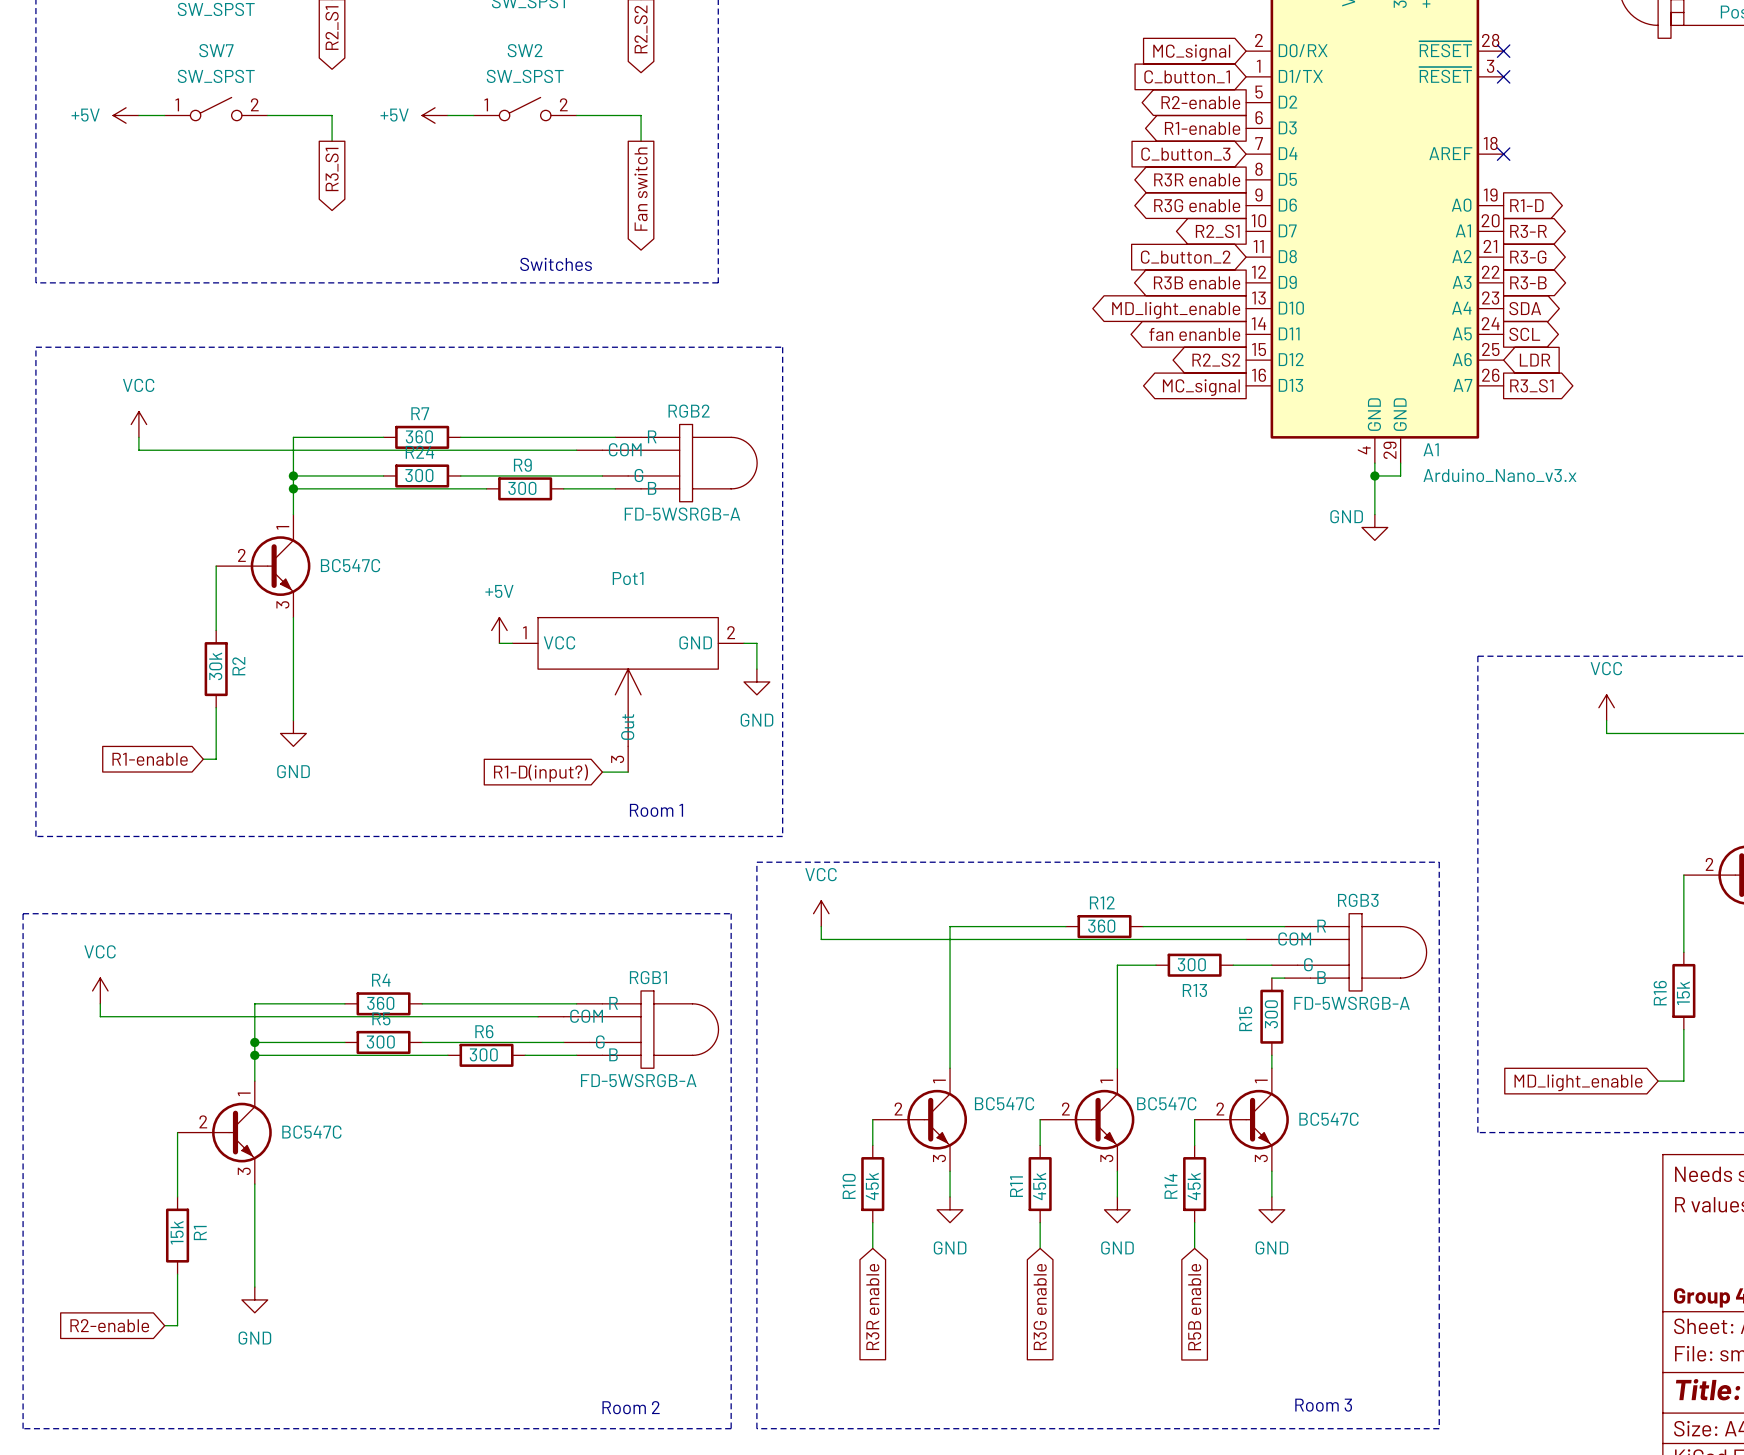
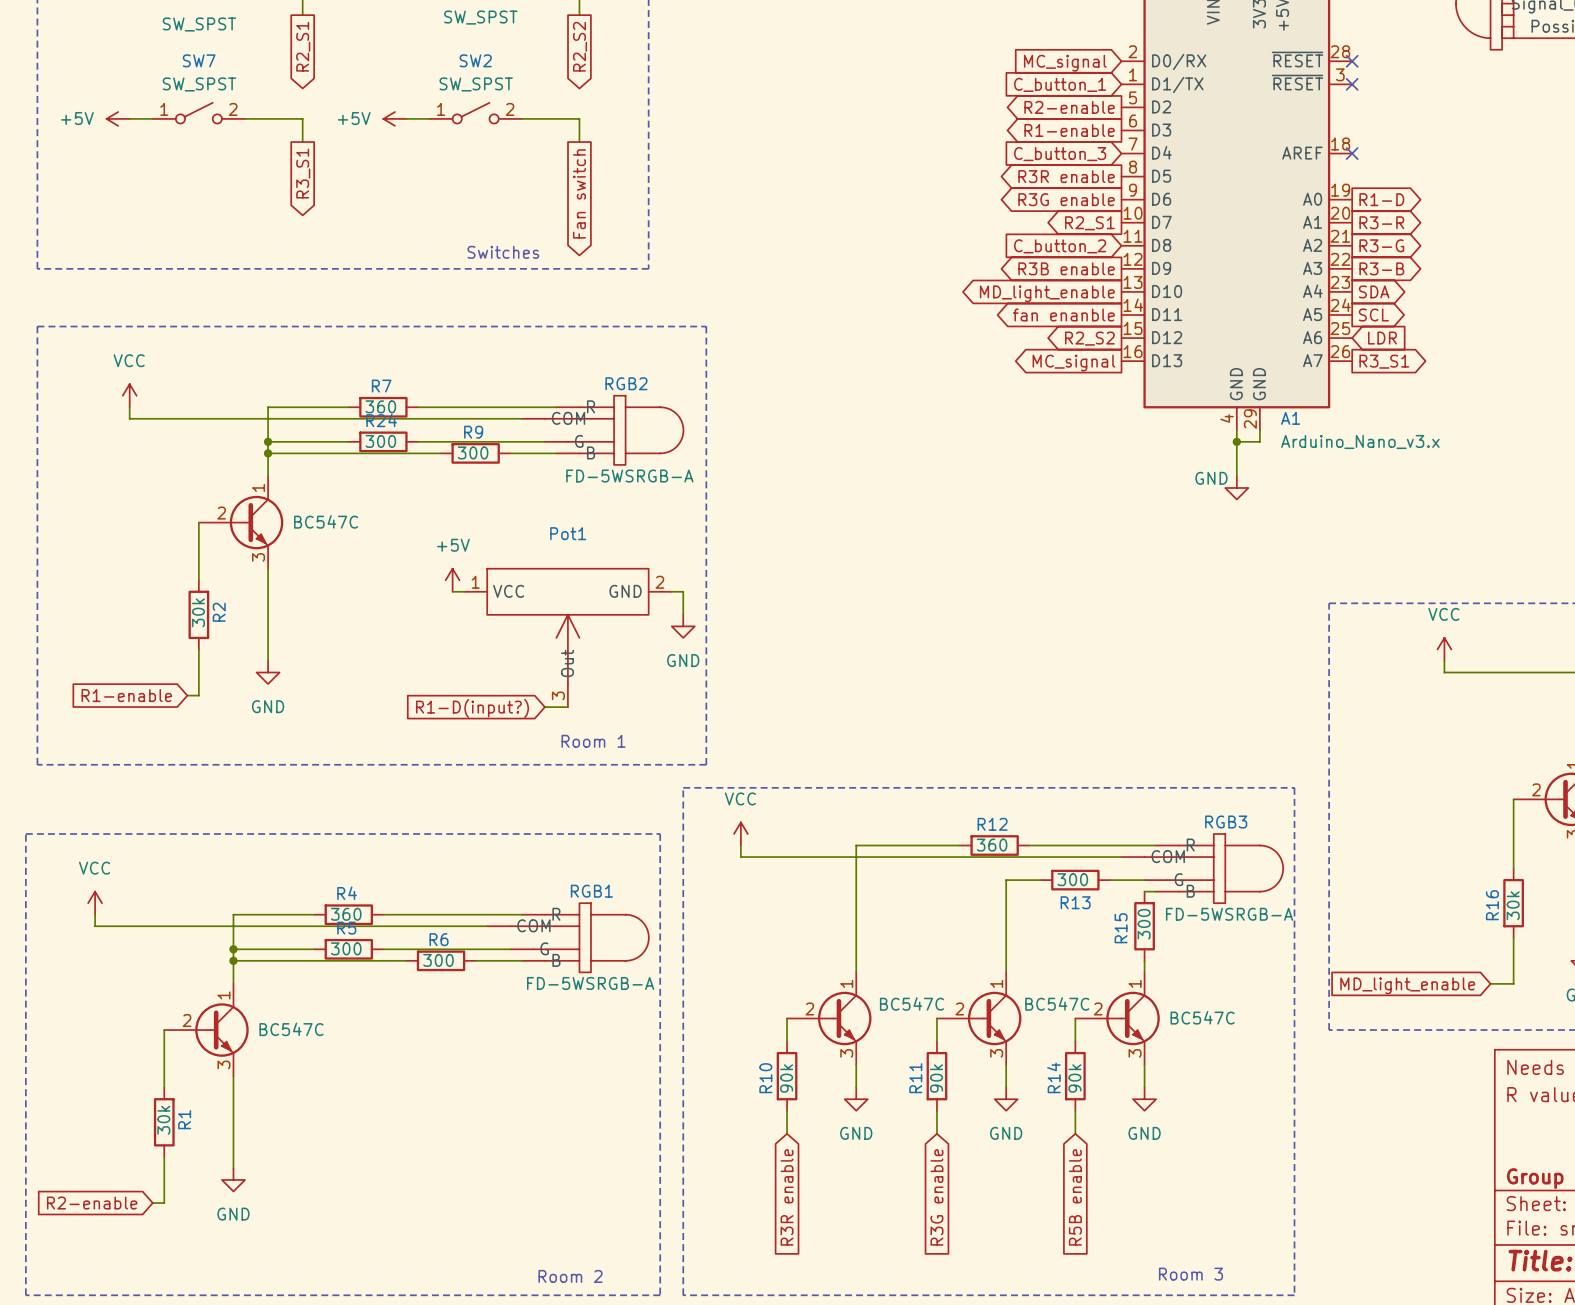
R16 value: 15k (1683, 993) -> 30k (1513, 905)
R10 value: 45k (872, 1186) -> 90k (786, 1078)
R11 value: 45k (1039, 1186) -> 90k (936, 1078)
R14 value: 45k (1194, 1186) -> 90k (1074, 1078)
R1 value: 15k (177, 1232) -> 30k (163, 1120)

